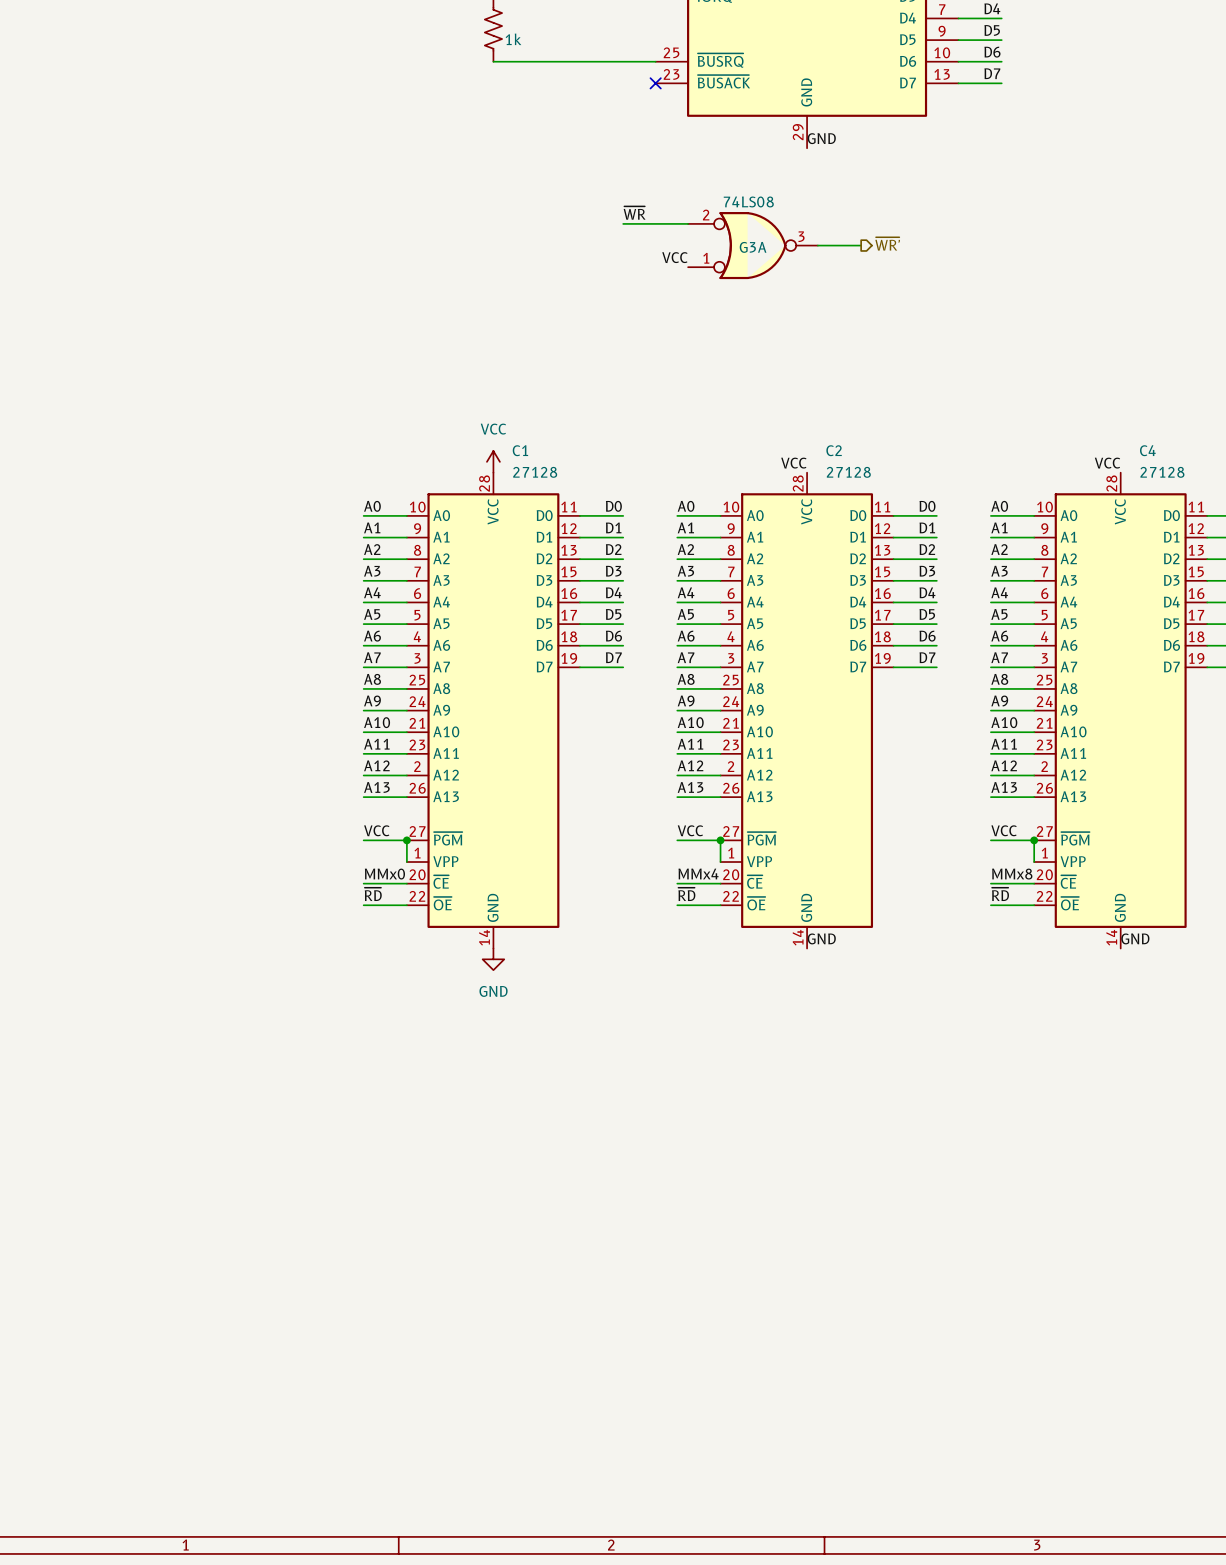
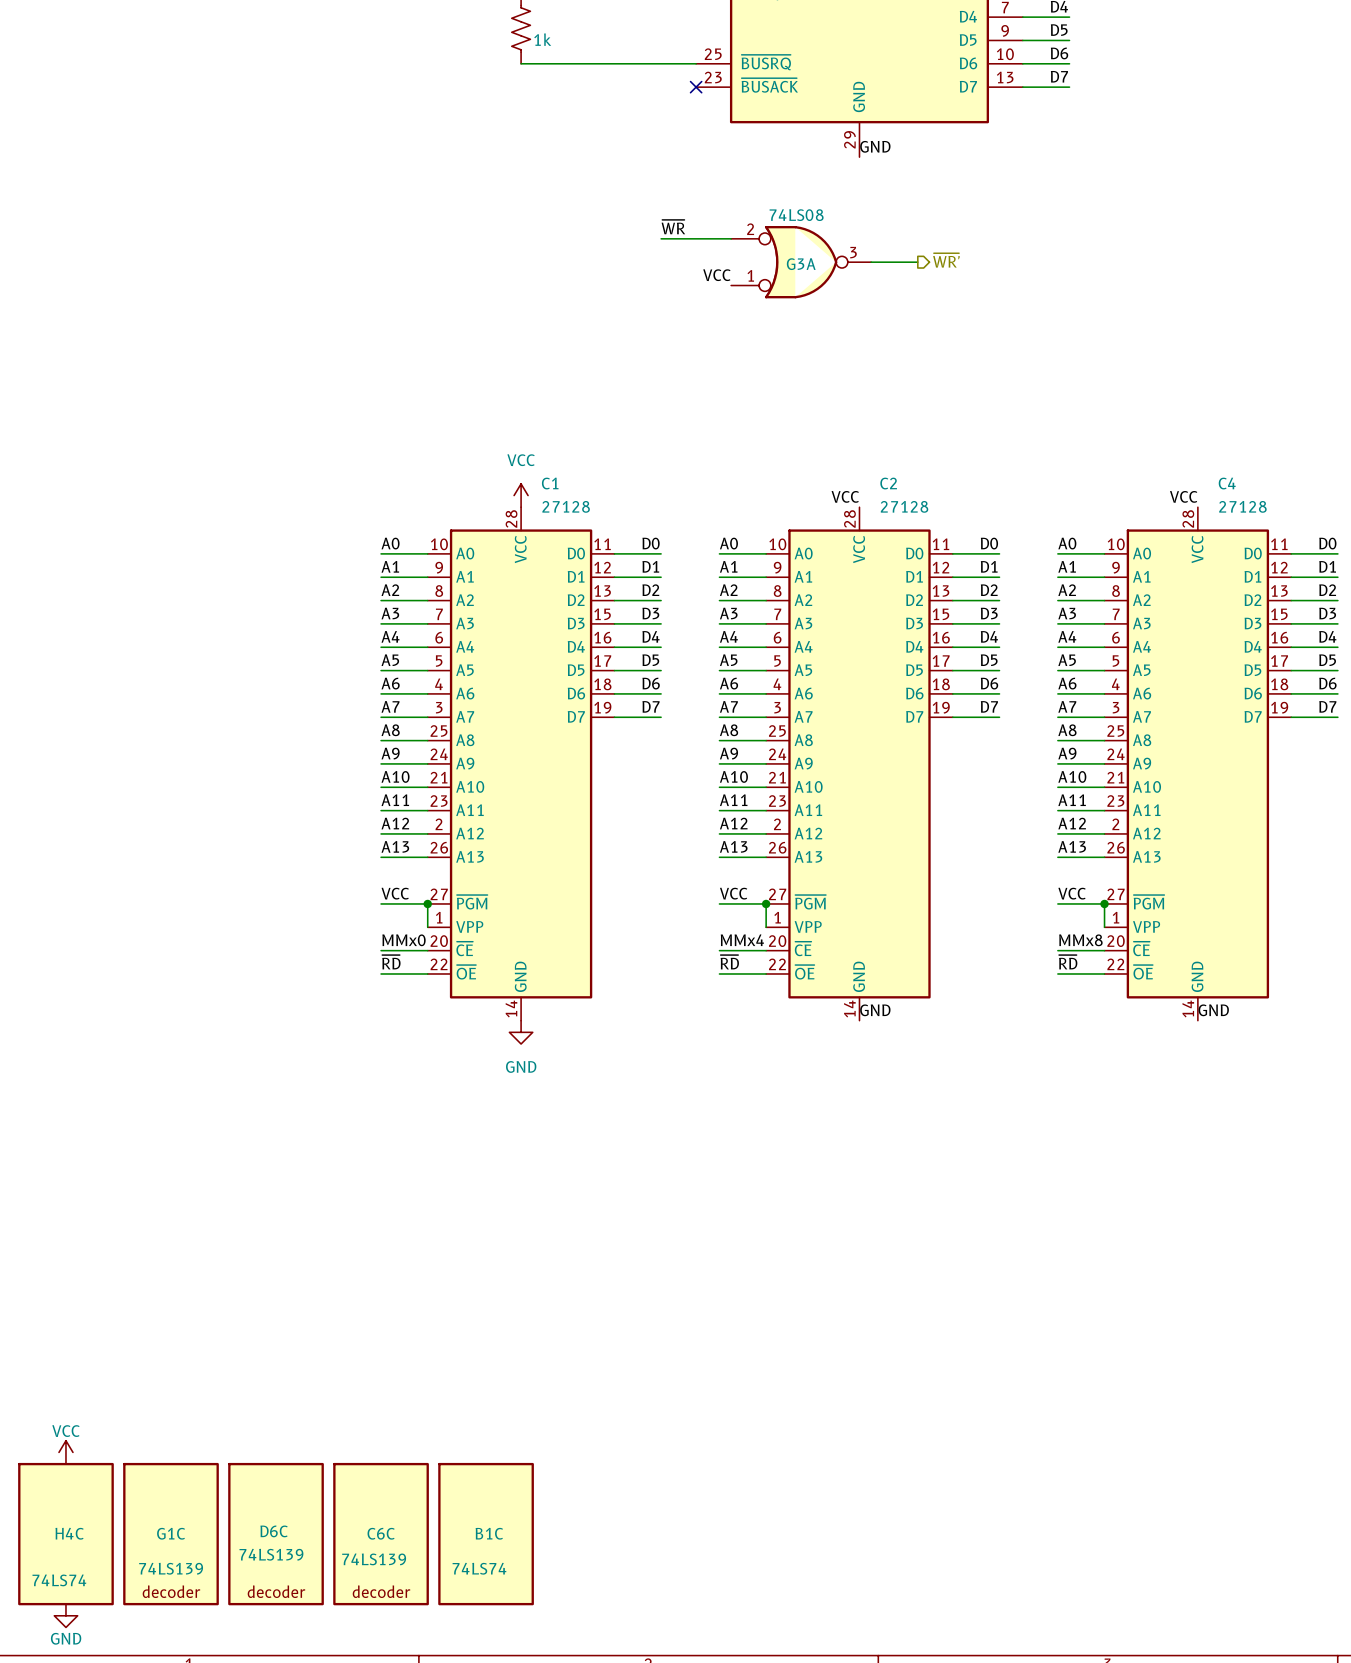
power symbol: none -> VCC (65, 1452)
H4C: none -> 74LS74 (65, 1534)
G1C: none -> 74LS139 (171, 1534)
D6C: none -> 74LS139 (276, 1534)
C6C: none -> 74LS139 (381, 1534)
B1C: none -> 74LS74 (486, 1534)
power symbol: none -> GND (65, 1615)

